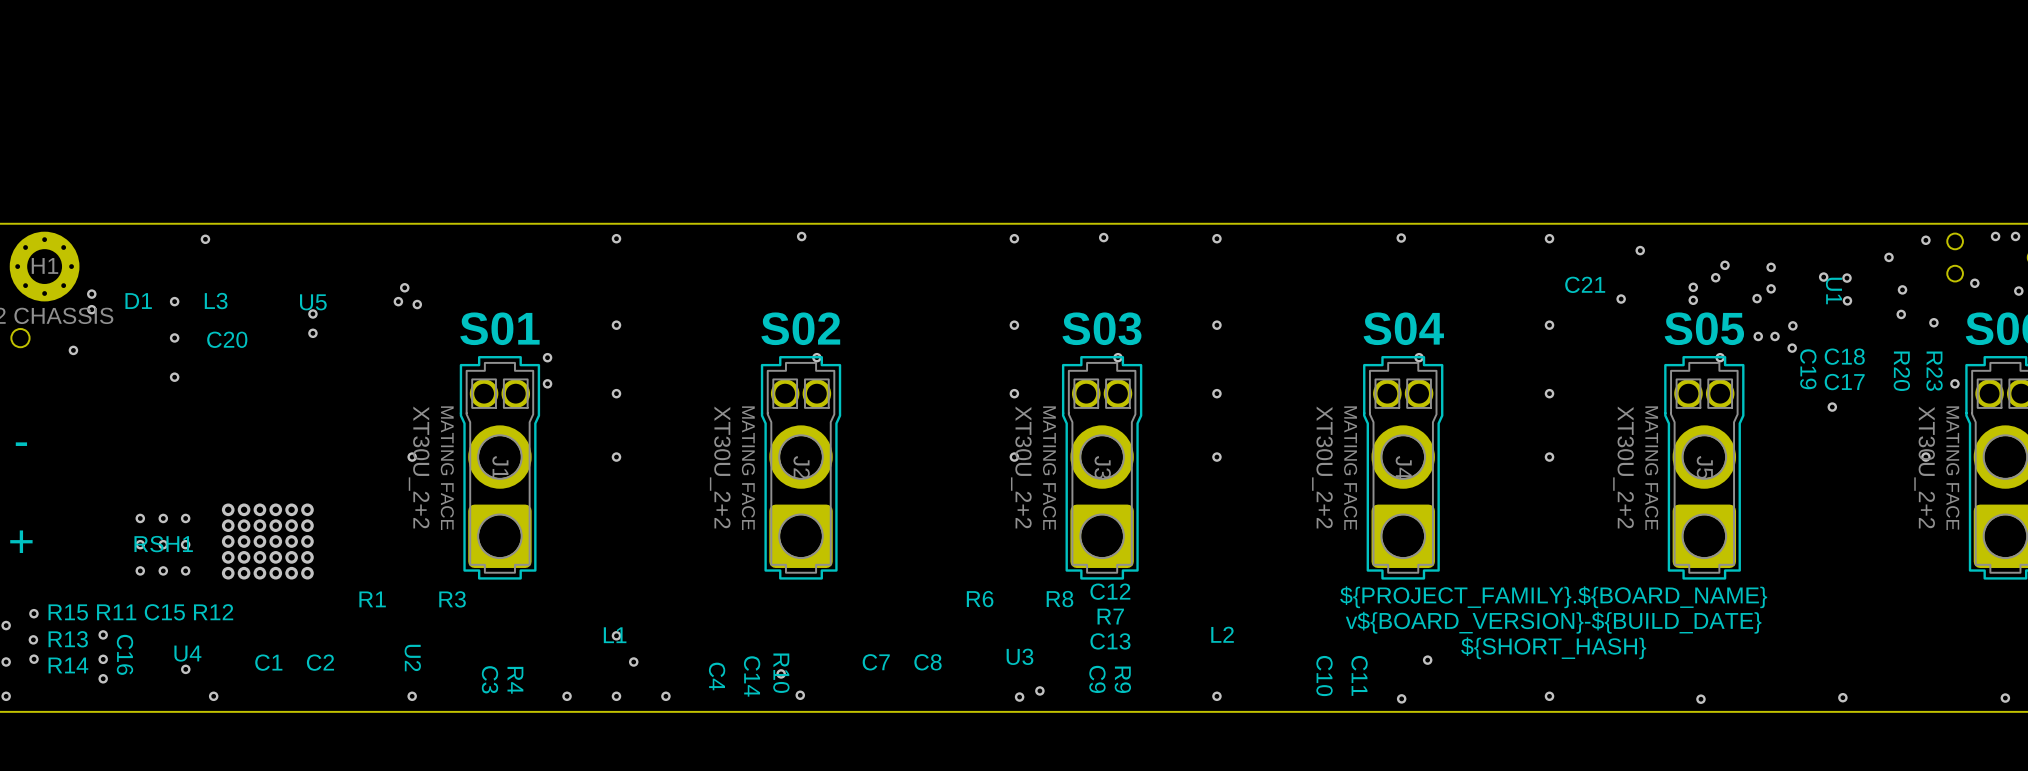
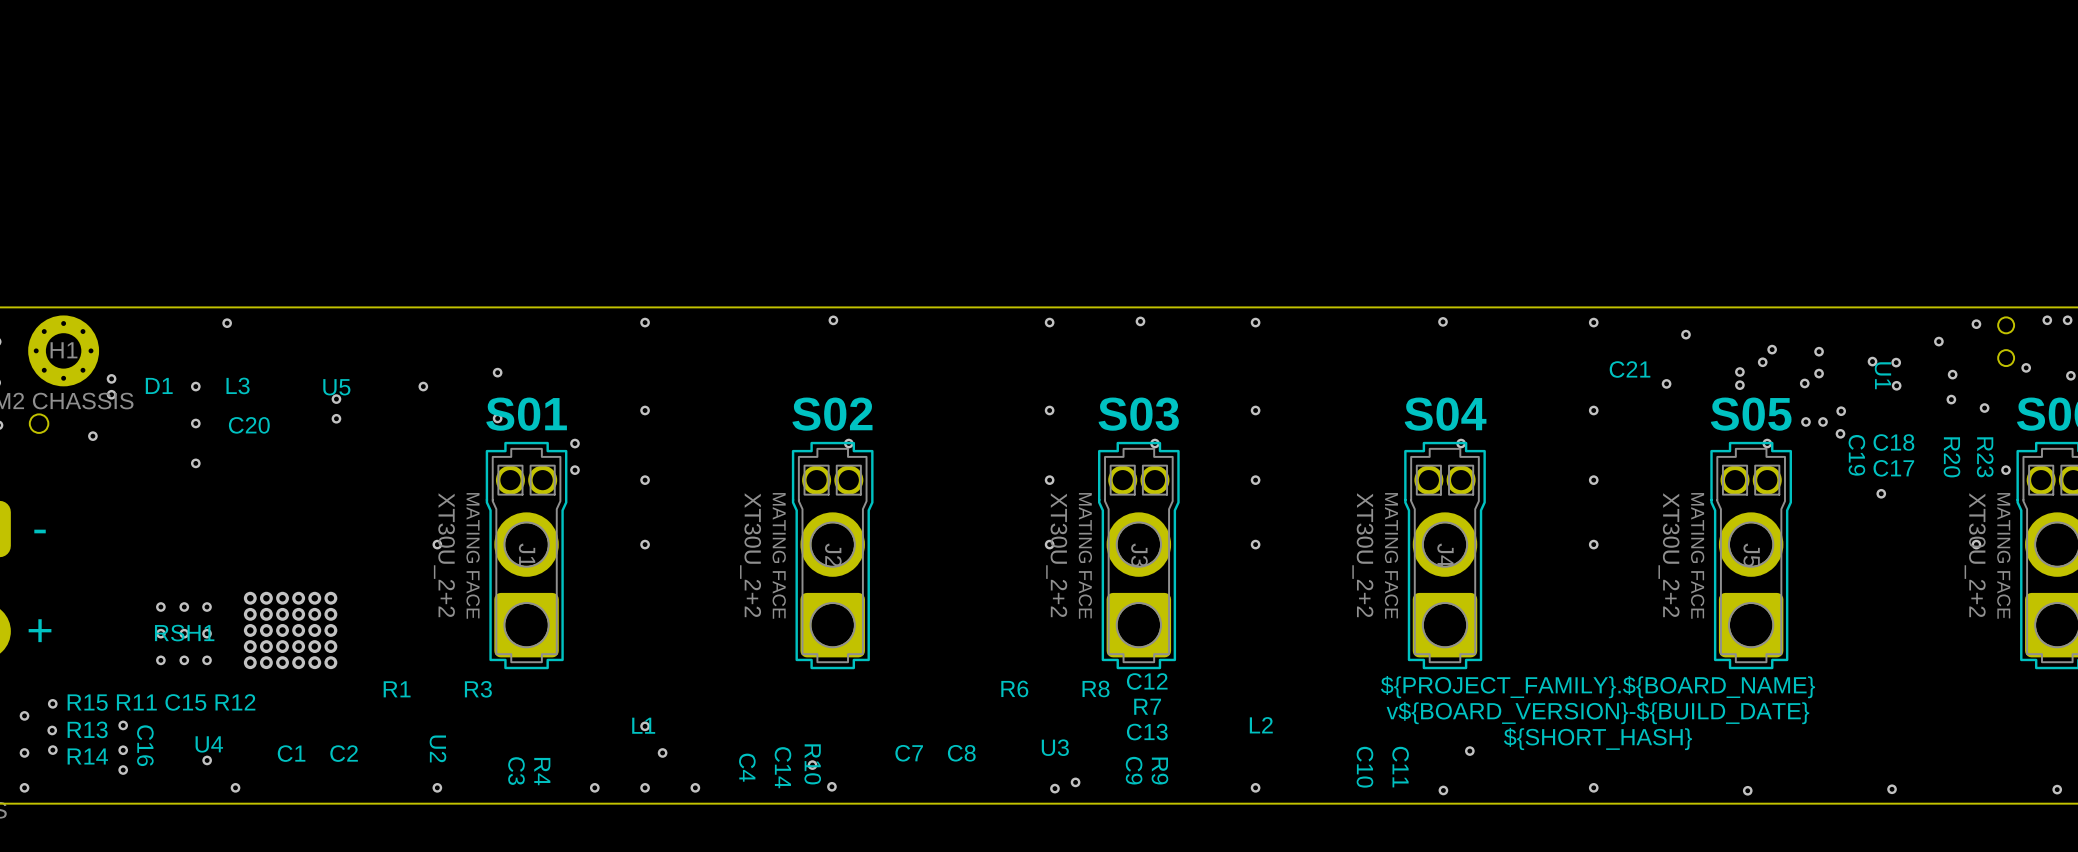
via: (404, 287) -> none
via: none -> (497, 372)
via: (417, 304) -> none
via: none -> (497, 418)

